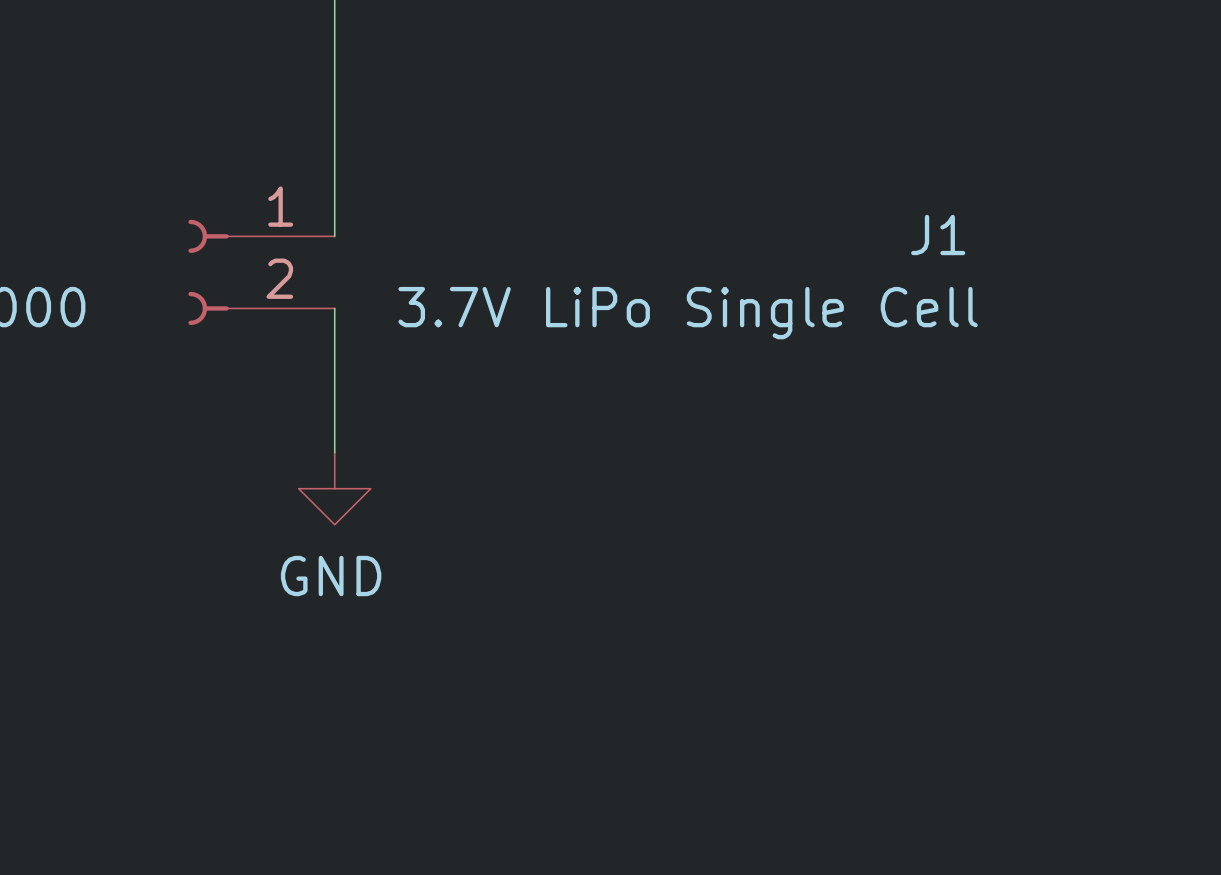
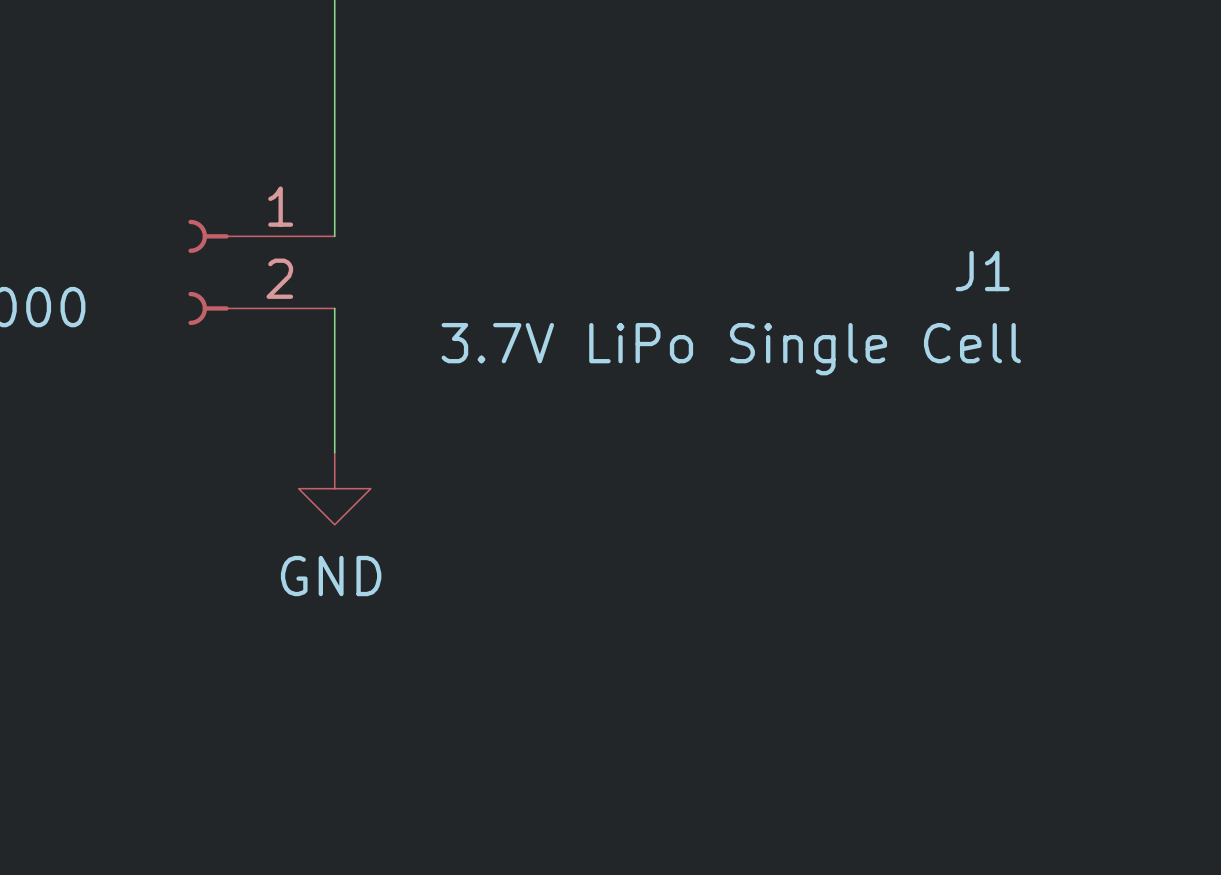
J1 name position: J1 (938, 235) -> J1 (982, 271)
J1 value position: 3.7V LiPo Single Cell (688, 313) -> 3.7V LiPo Single Cell (731, 349)

